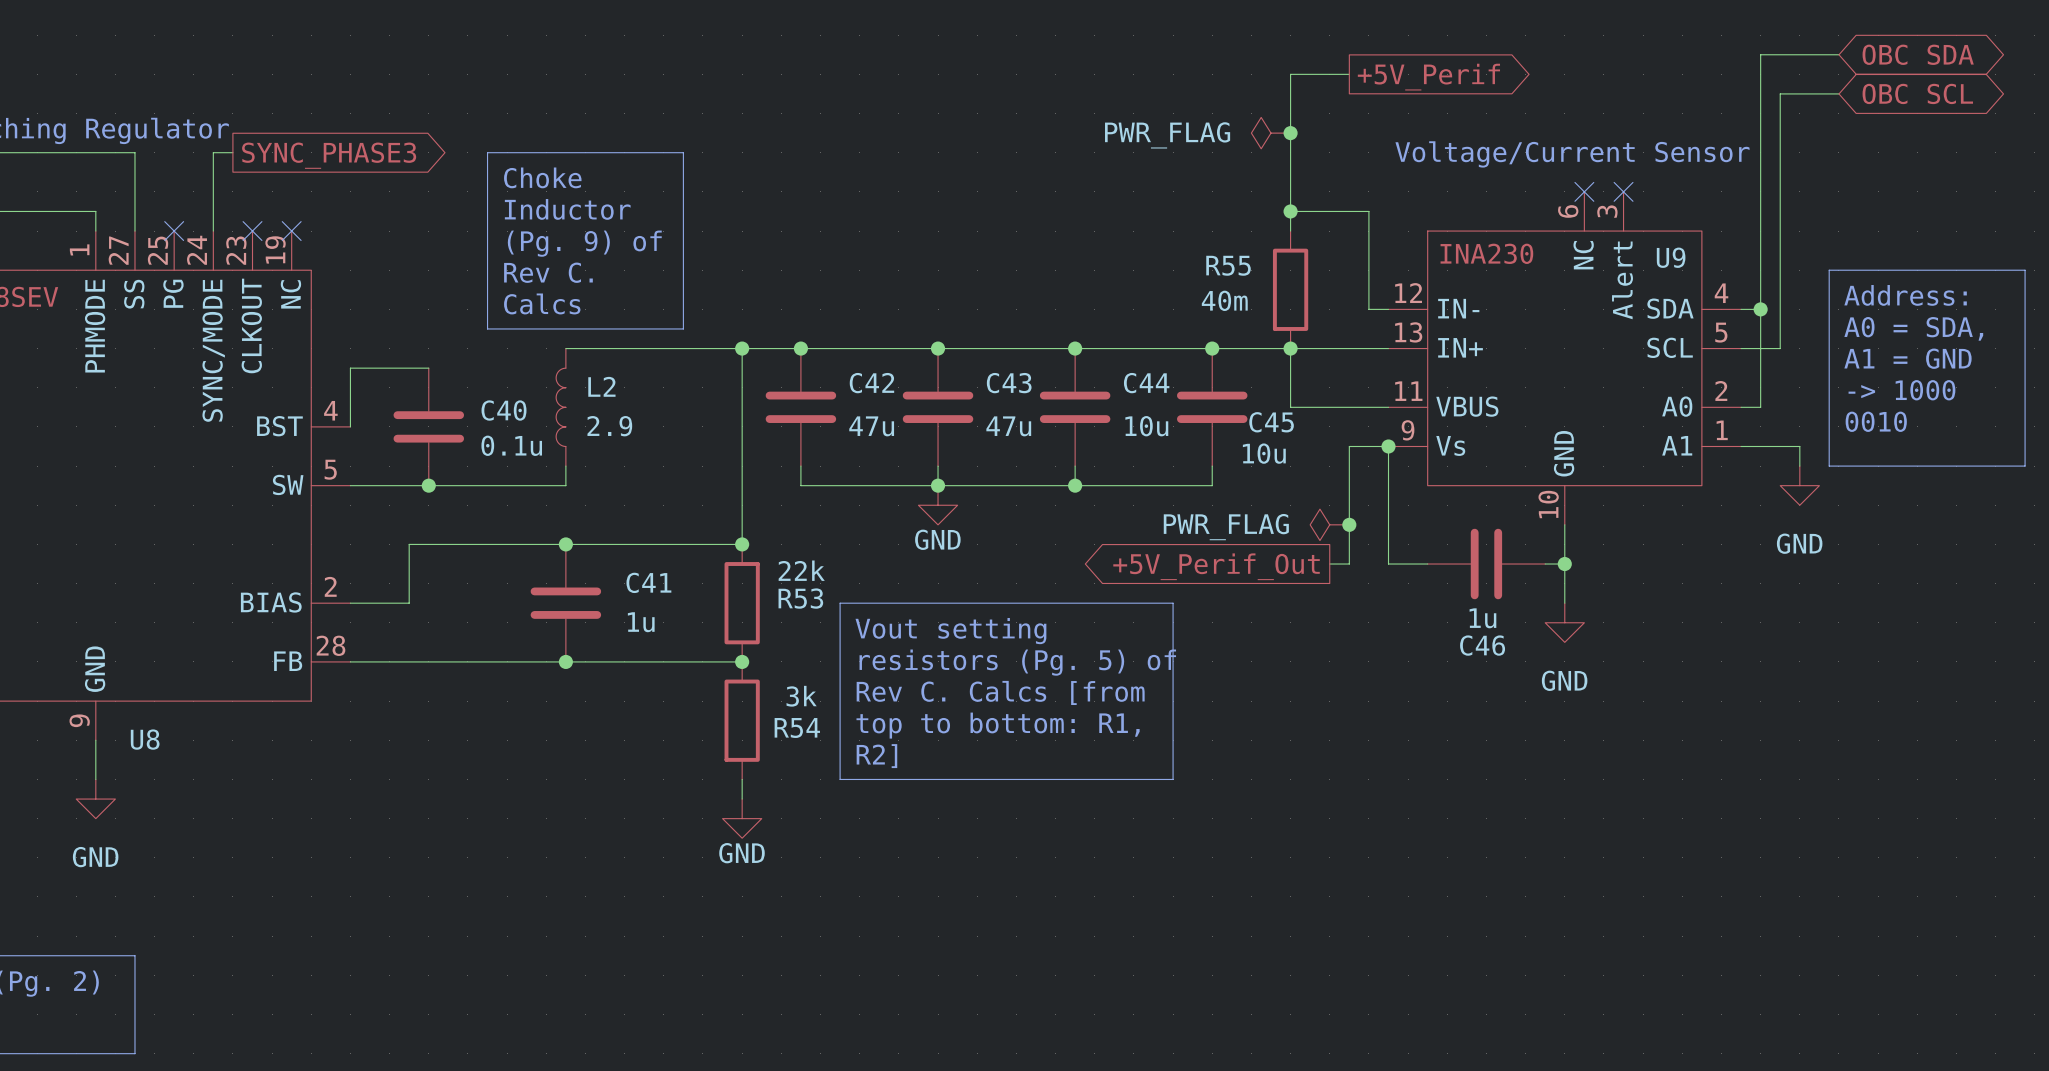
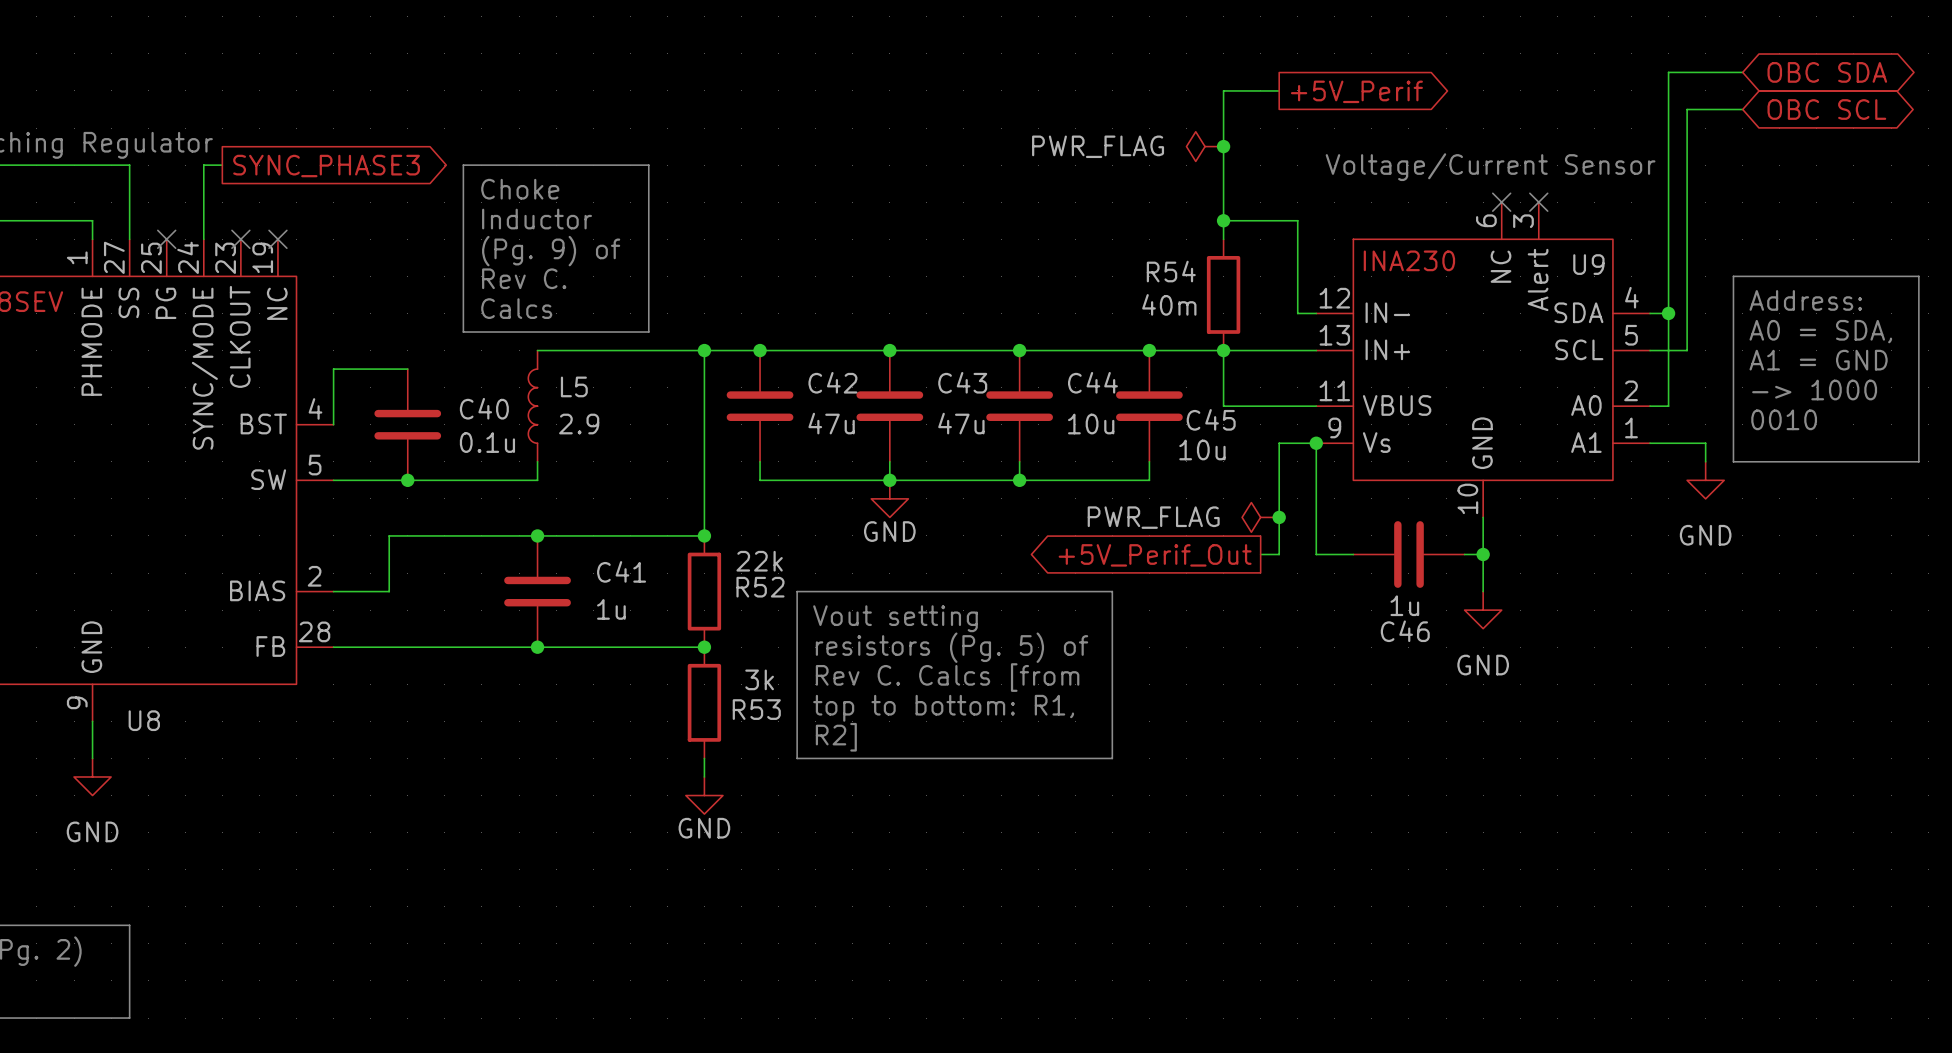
R55 name: R55 (1228, 265) -> R54 (1171, 271)
L2 name: L2 (601, 386) -> L5 (574, 386)
R53 name: R53 (800, 598) -> R52 (760, 587)
R54 name: R54 (797, 727) -> R53 (756, 709)

